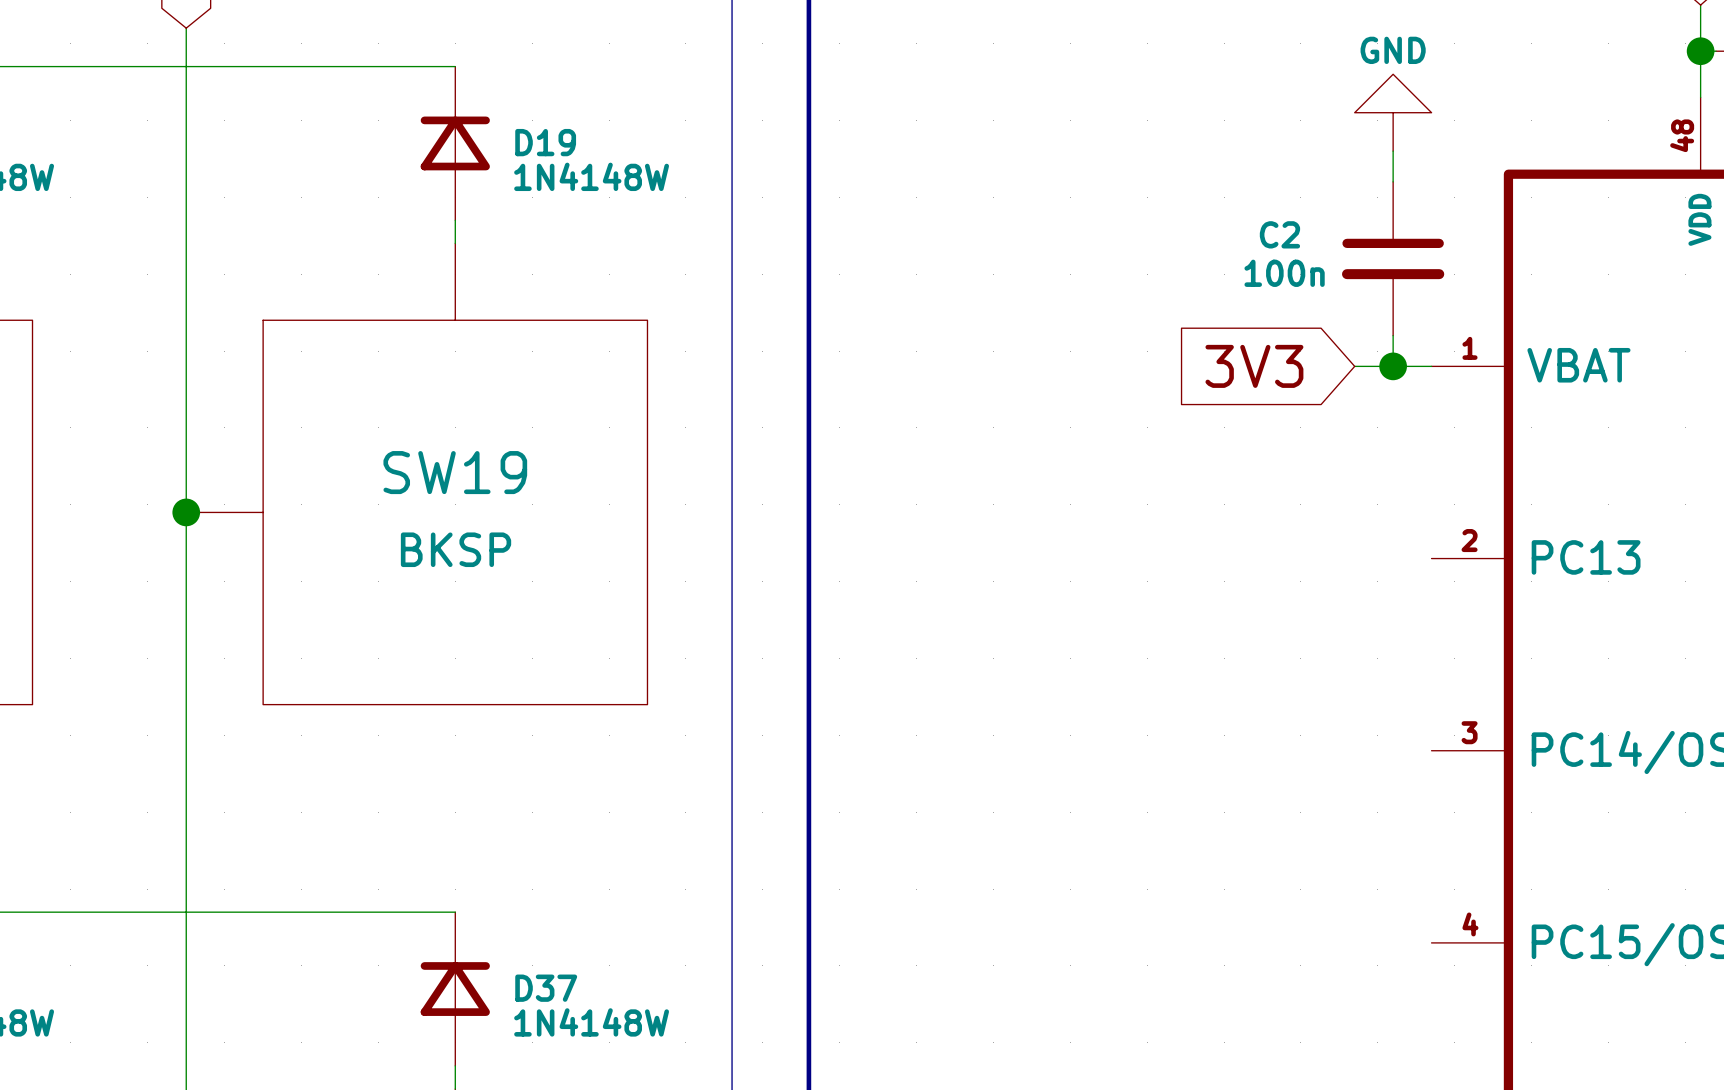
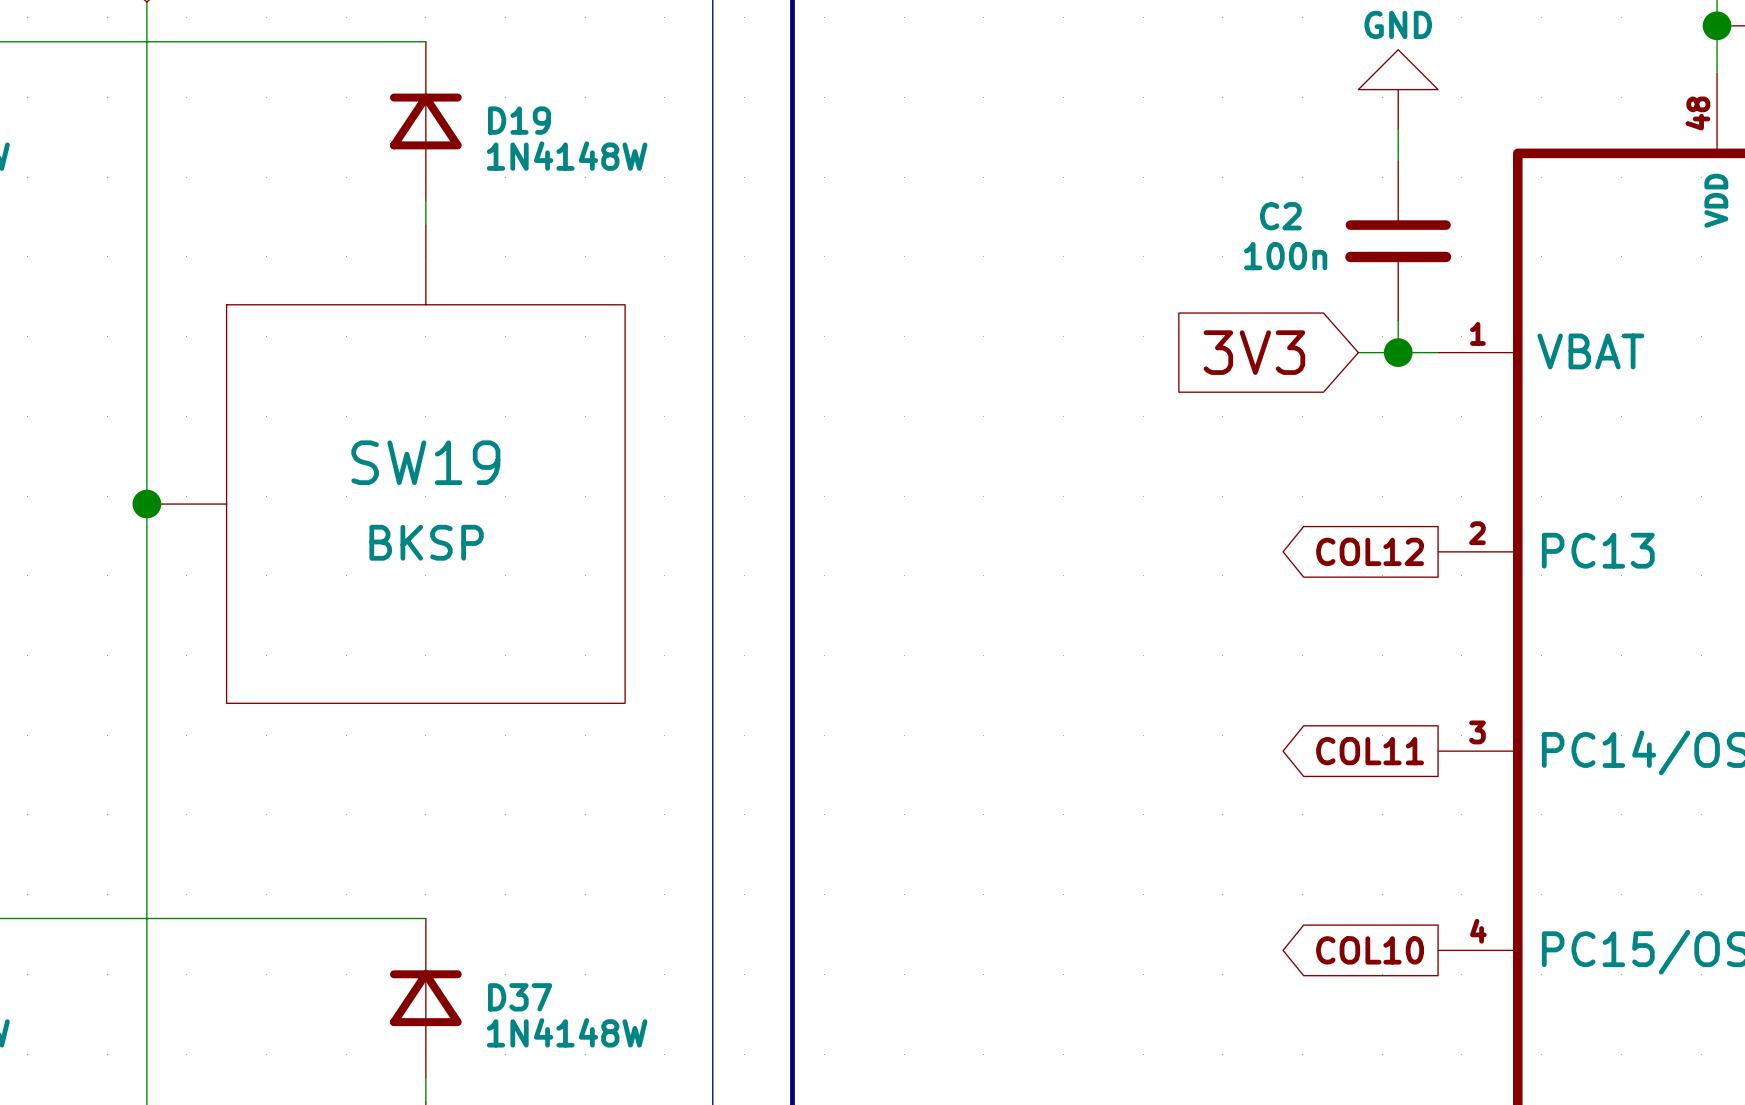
global label: none -> COL12 (1370, 551)
global label: none -> COL11 (1370, 751)
global label: none -> COL10 (1370, 950)

